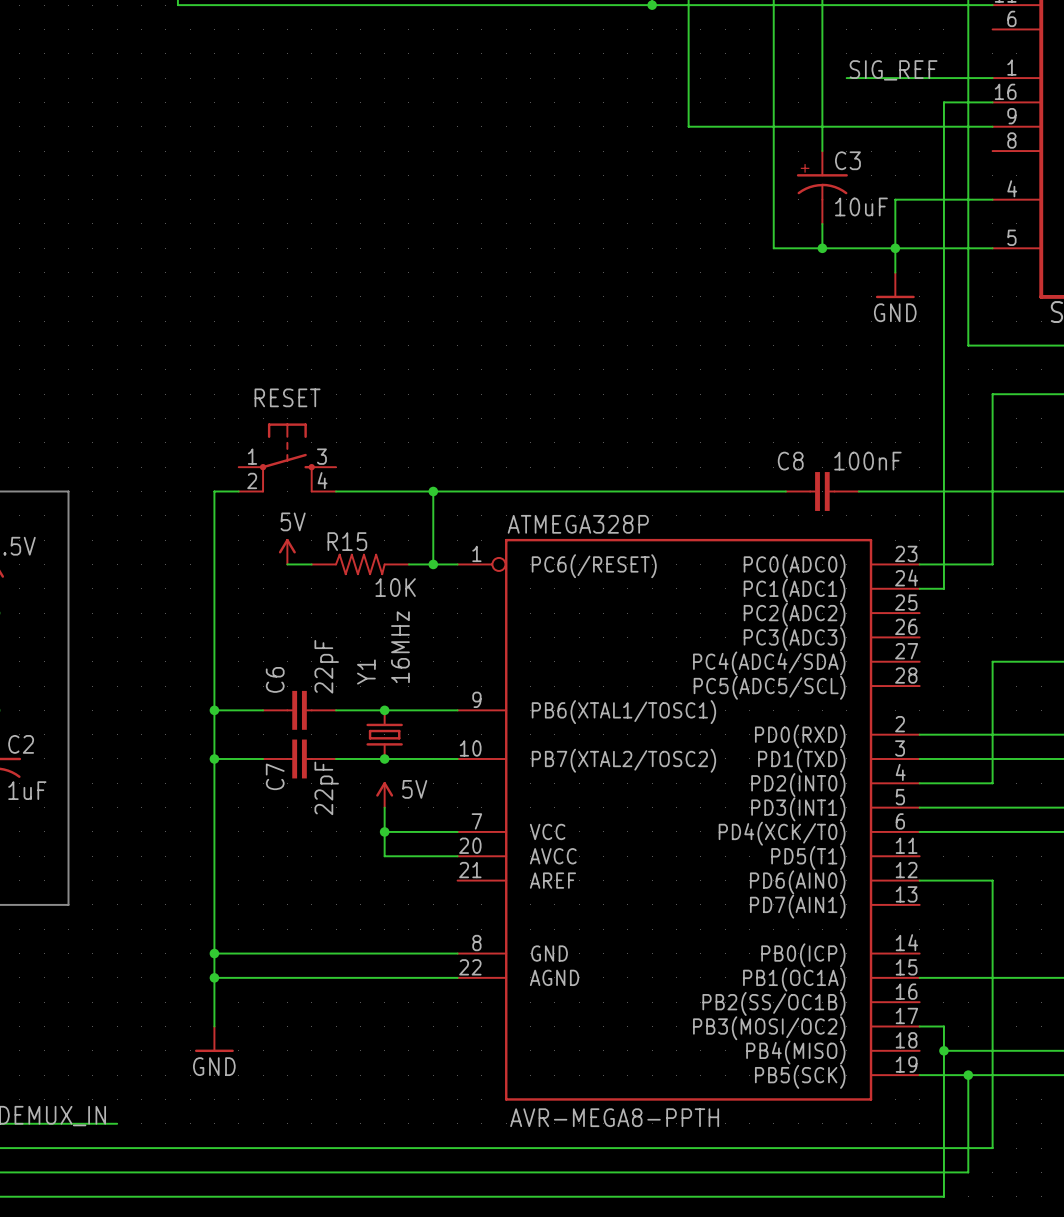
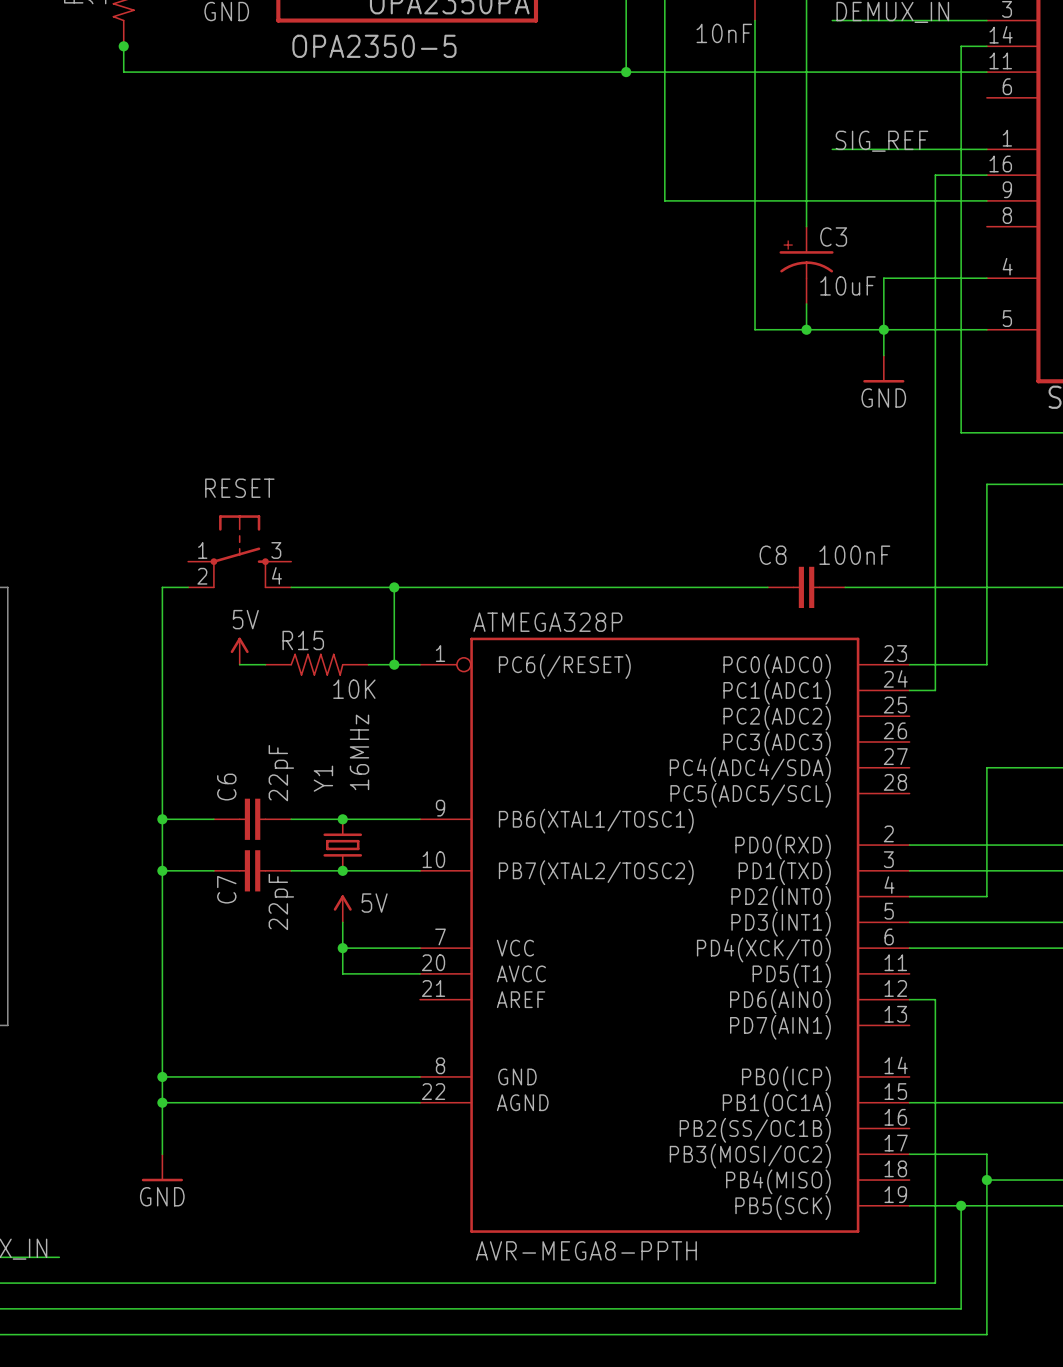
wire: (943, 880) (992, 880) (992, 1026) -> (935, 999) (935, 1154) (986, 1154)
wire: (943, 1050) (992, 1050) -> none
junction position: (943, 1050) -> (986, 1180)
wire: (992, 1148) (943, 1148) (943, 1196) -> (986, 1283) (986, 1334) (935, 1334)

